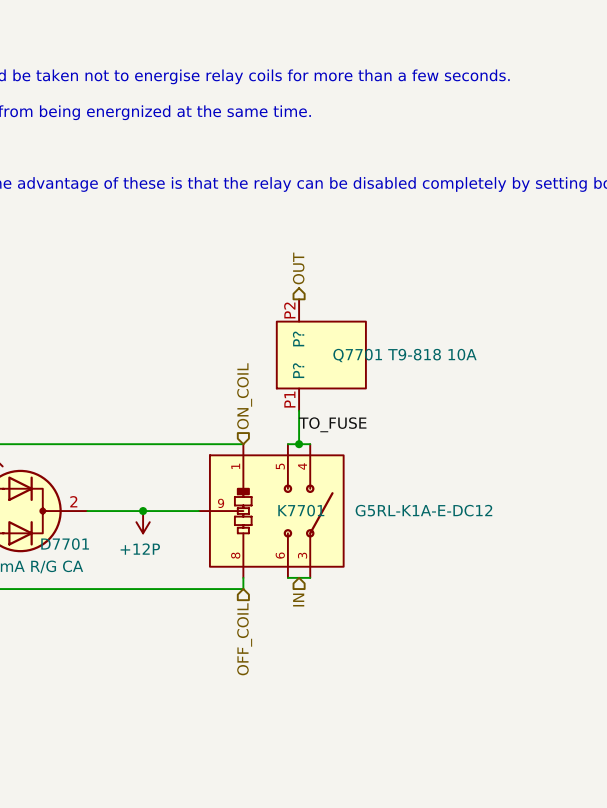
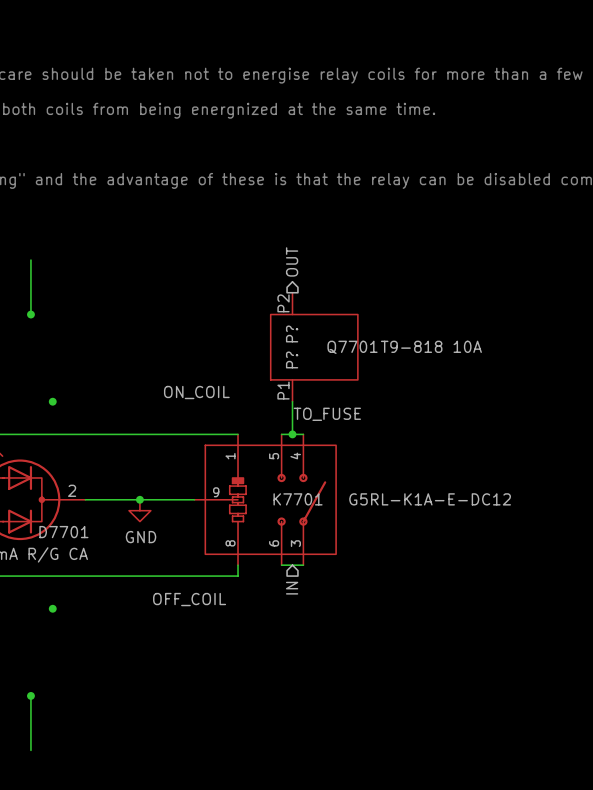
wire: none -> (30, 260) (30, 314)
junction: none -> (30, 314)
hierarchical label: ON_COIL (244, 396) -> none
label: none -> ON_COIL (196, 392)
junction: none -> (52, 401)
power symbol: +12P (143, 522) -> GND (139, 510)
label: none -> OFF_COIL (189, 599)
junction: none -> (52, 608)
hierarchical label: OFF_COIL (244, 639) -> none
wire: none -> (30, 695) (30, 750)
junction: none -> (30, 695)

